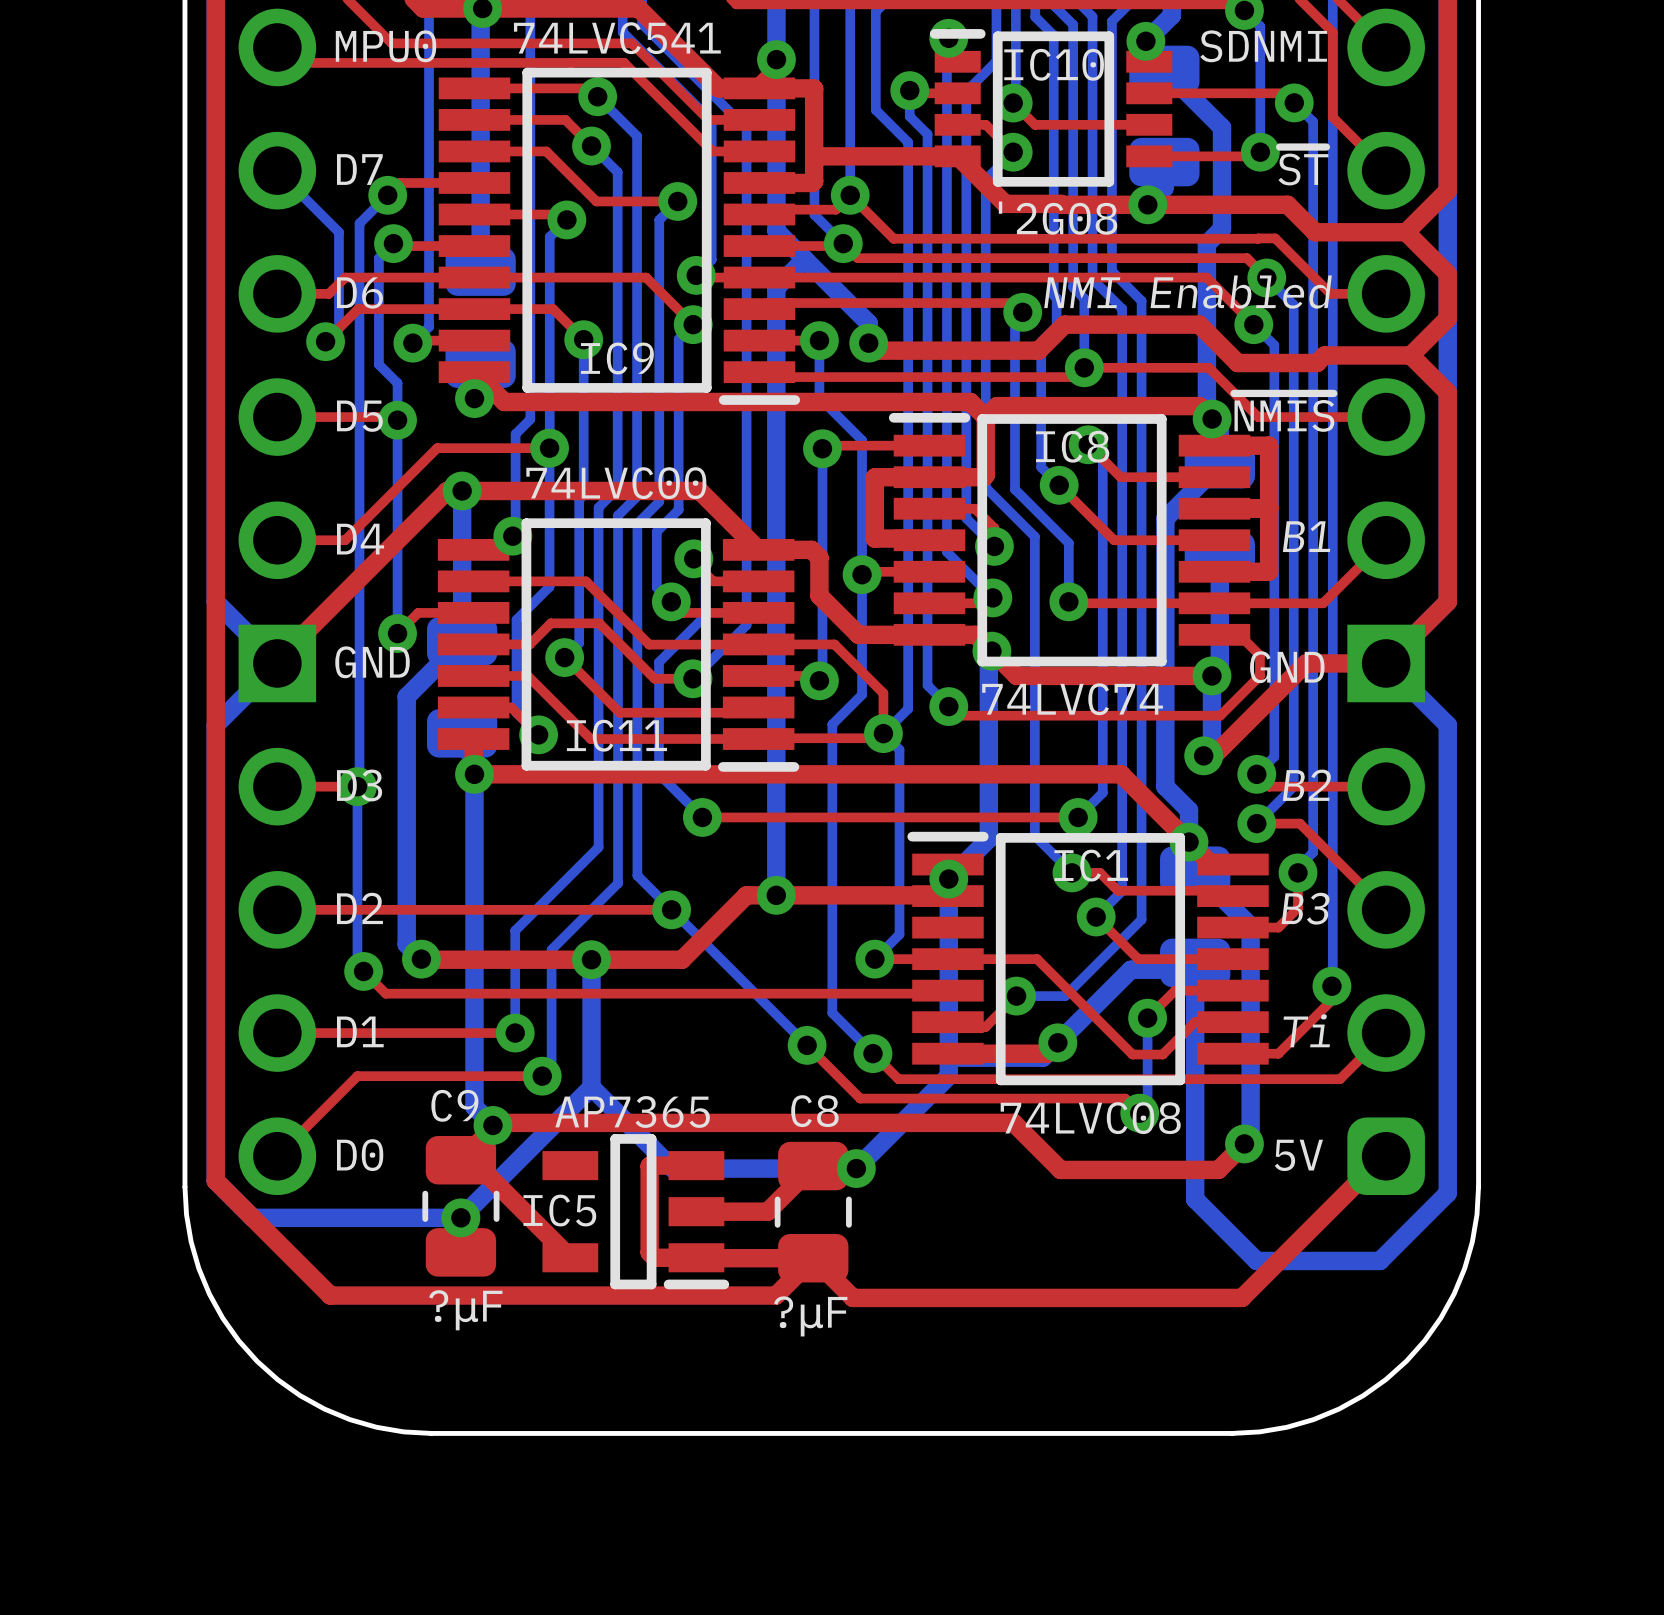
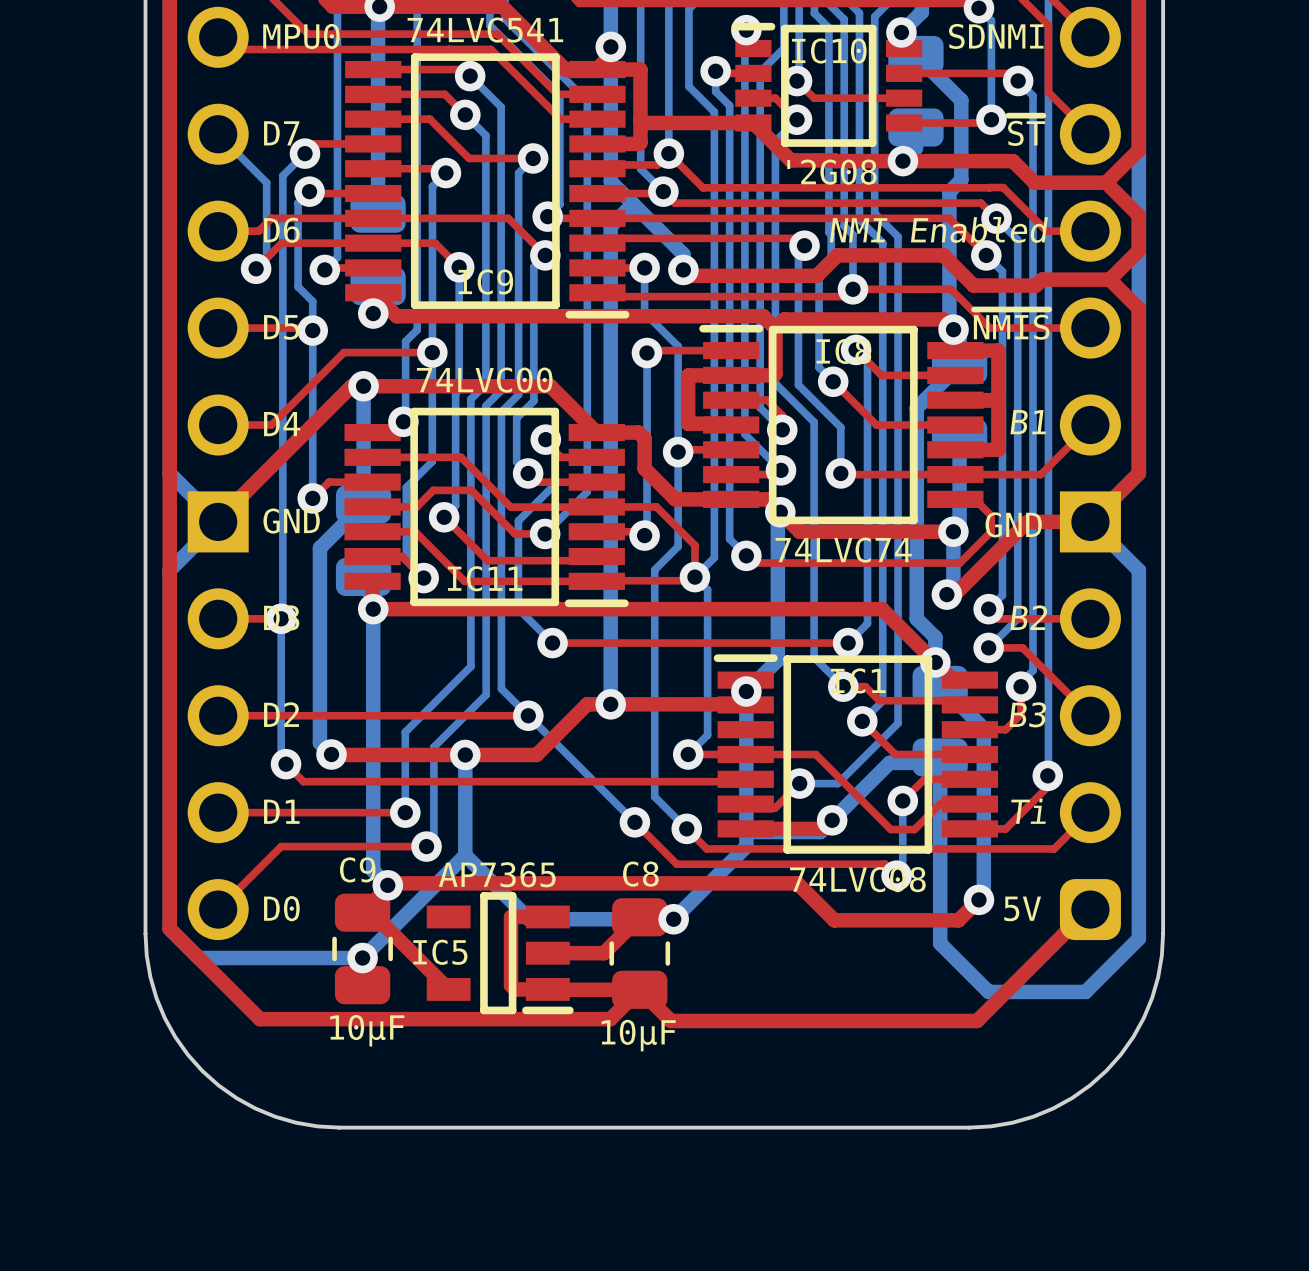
C9 value: ?μF (465, 1310) -> 10µF (367, 1030)
C8 value: ?μF (810, 1316) -> 10µF (638, 1035)

